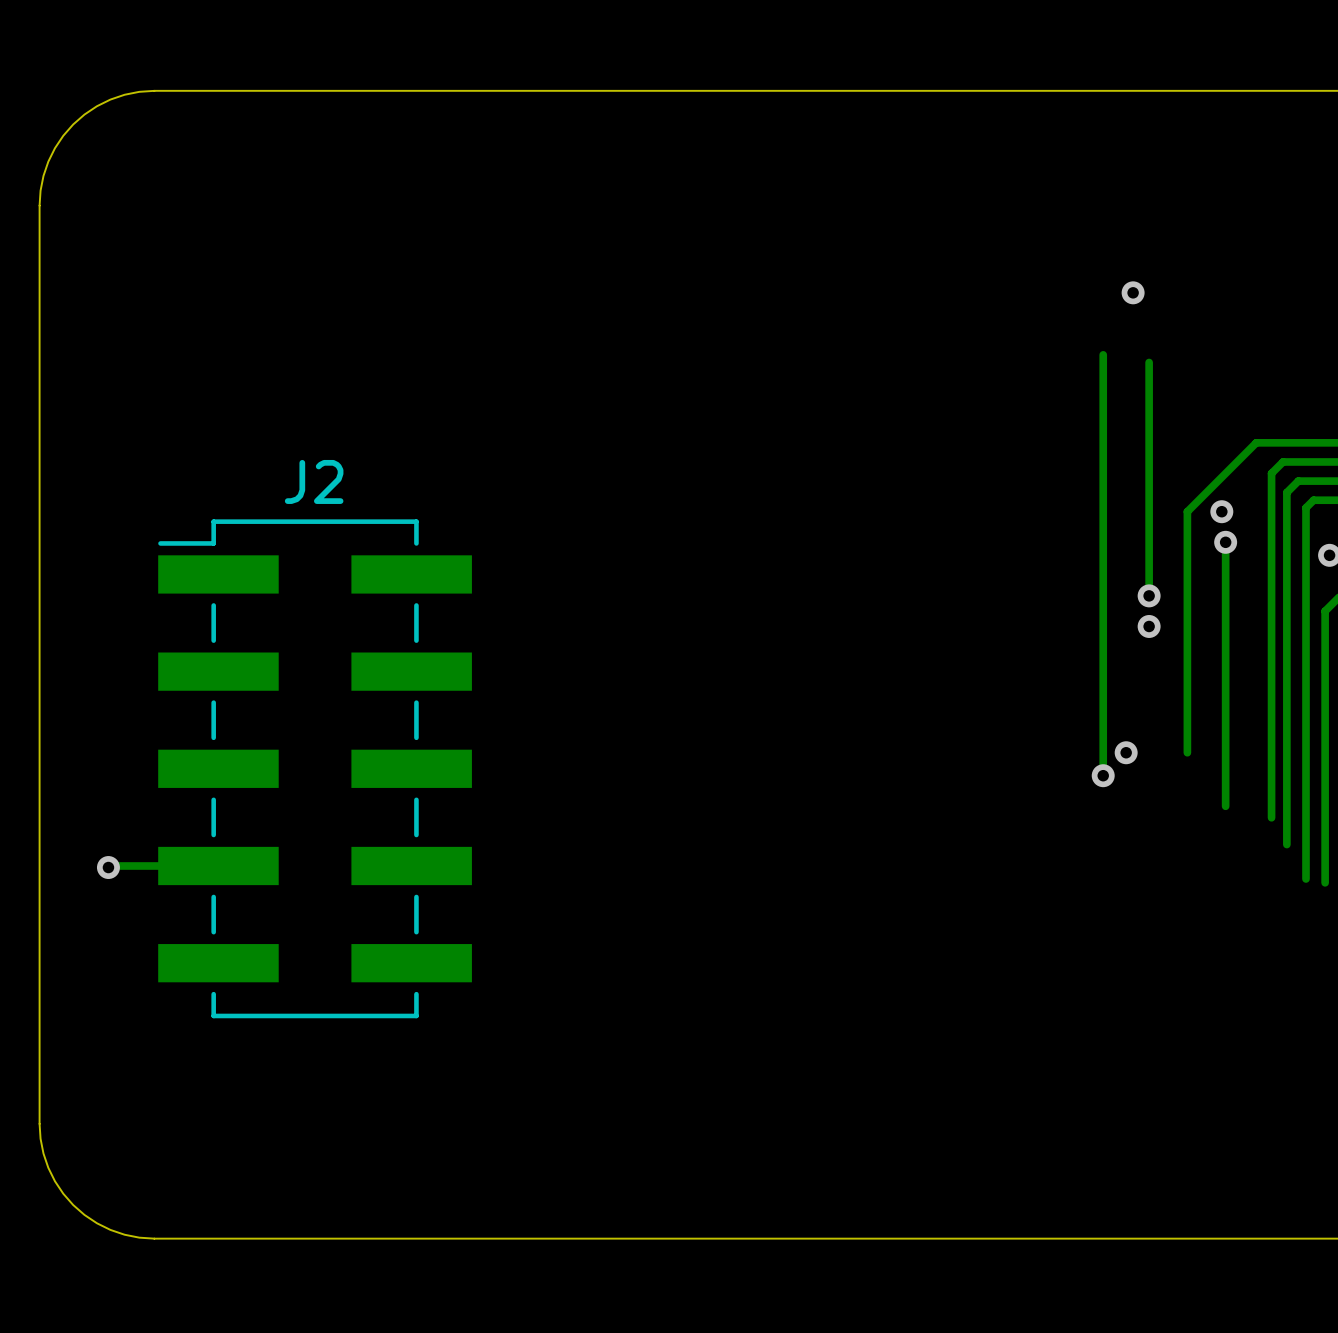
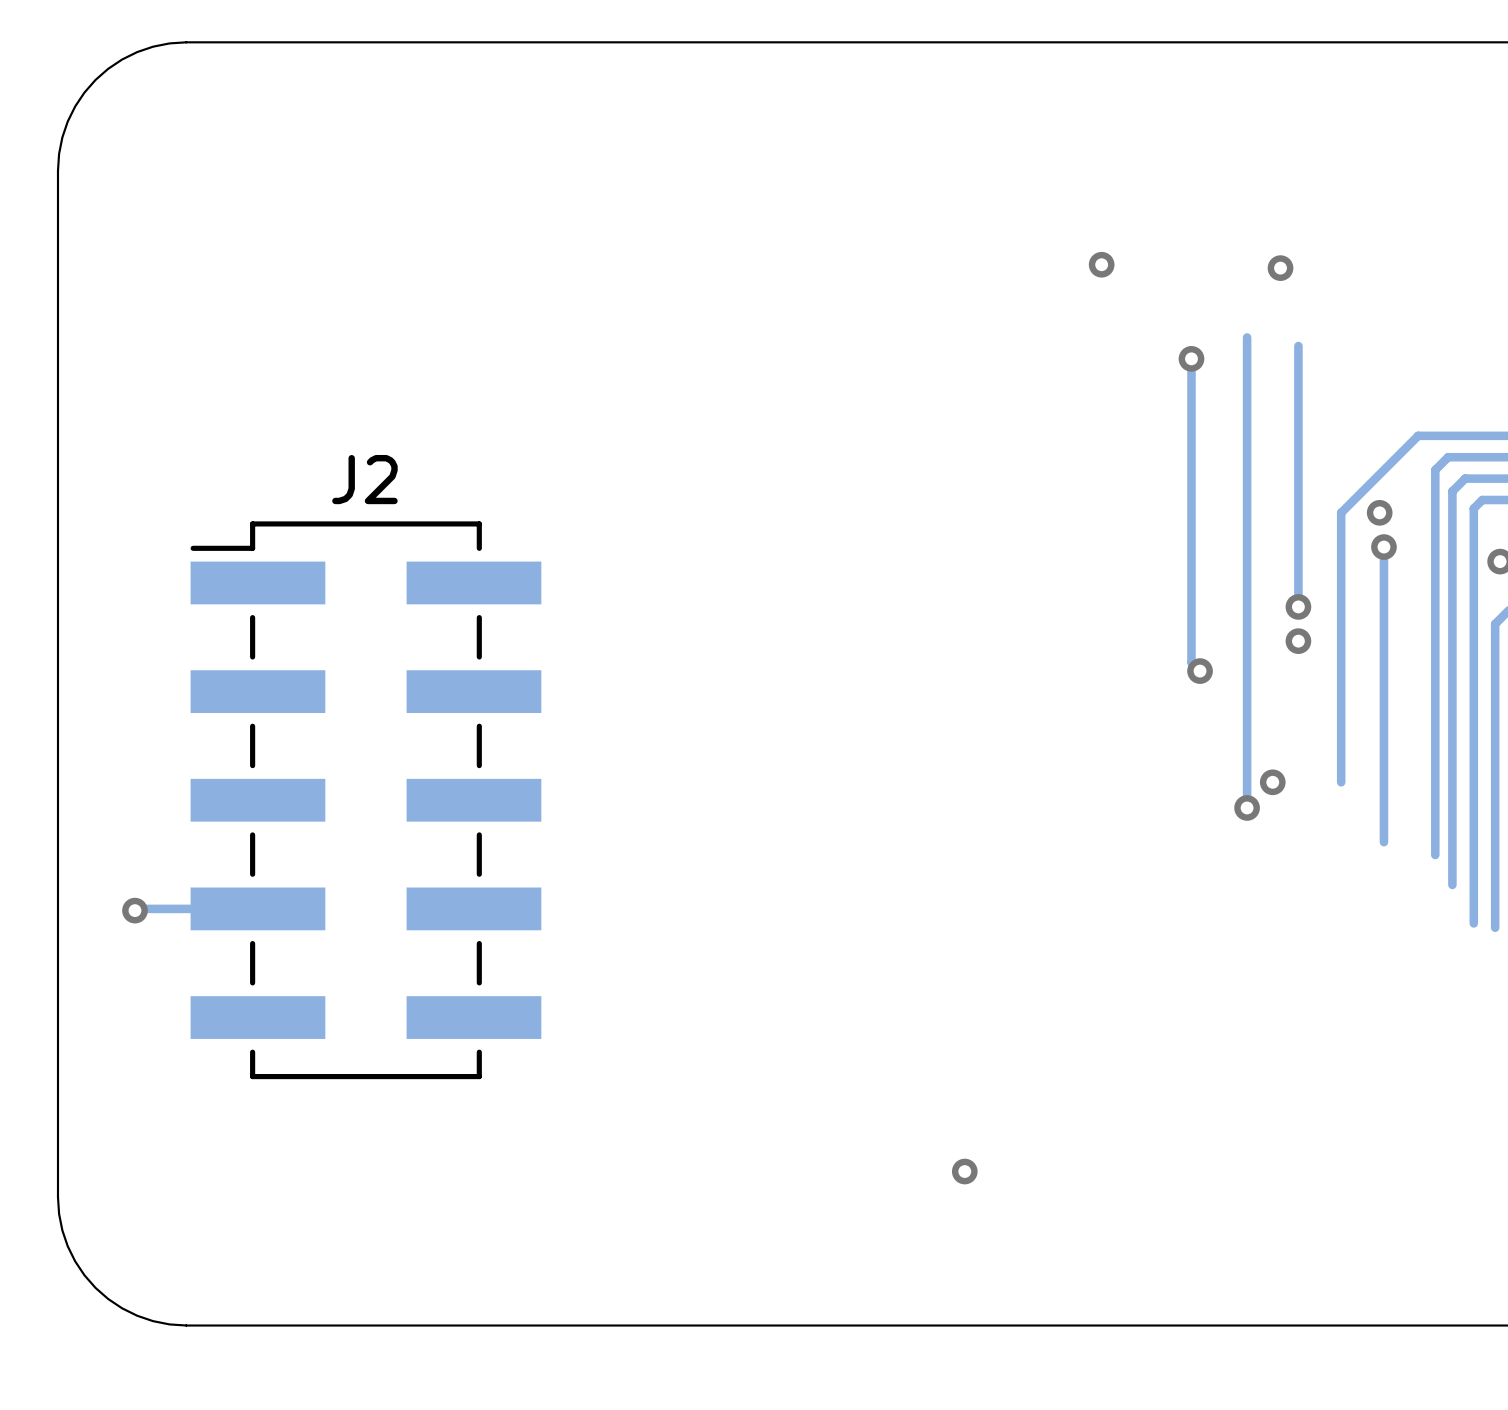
via: none -> (1101, 264)
track: none -> (1191, 358) (1191, 662) (1200, 671)
via: none -> (1191, 358)
via: none -> (1200, 671)
via: none -> (964, 1171)

